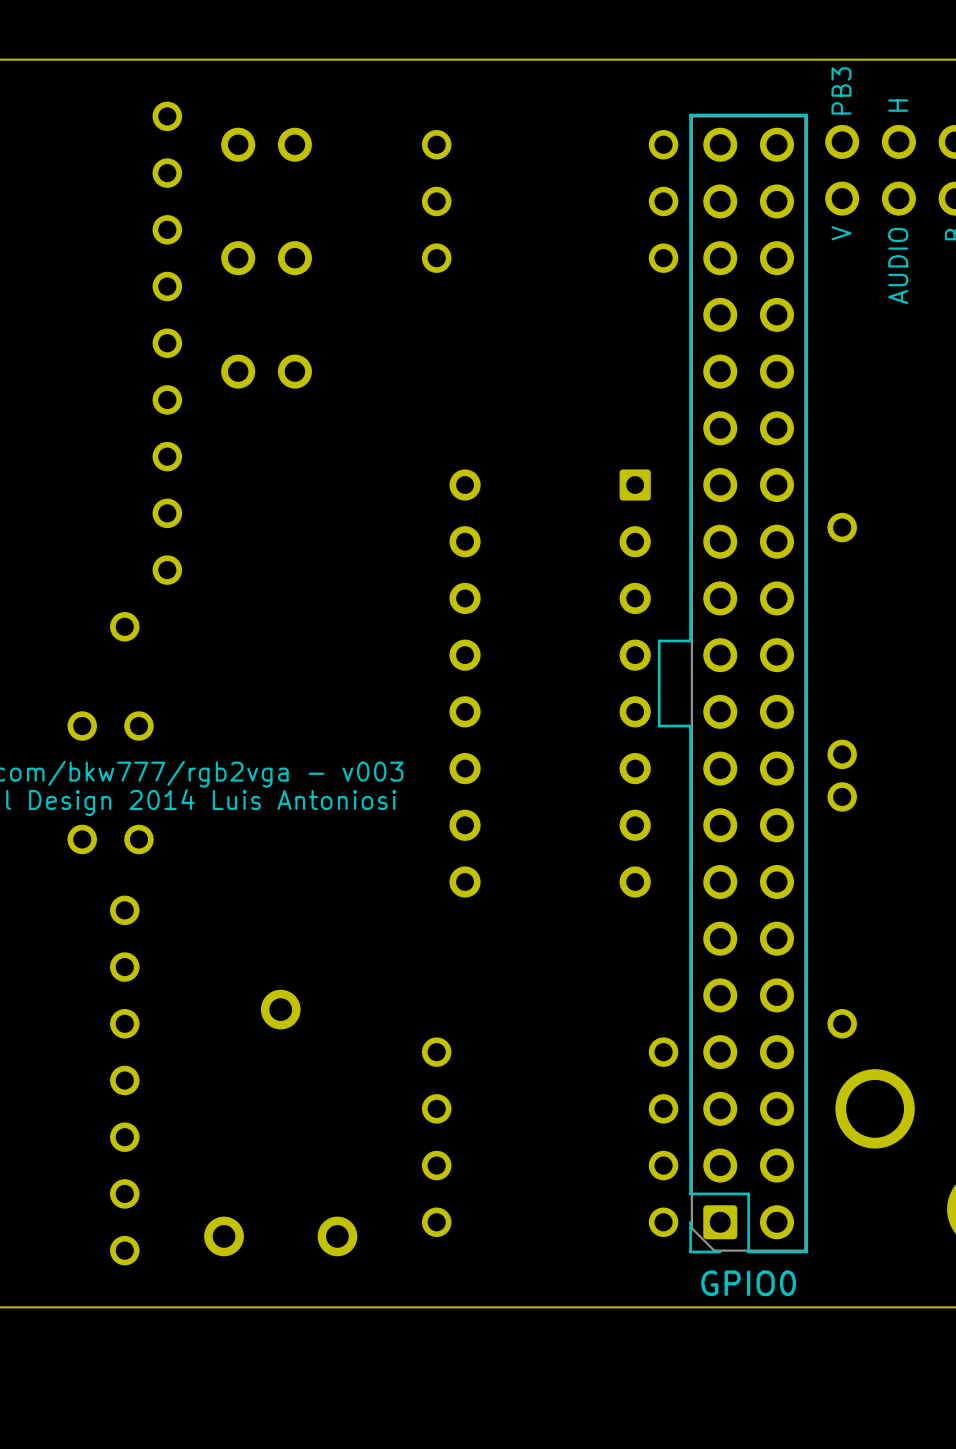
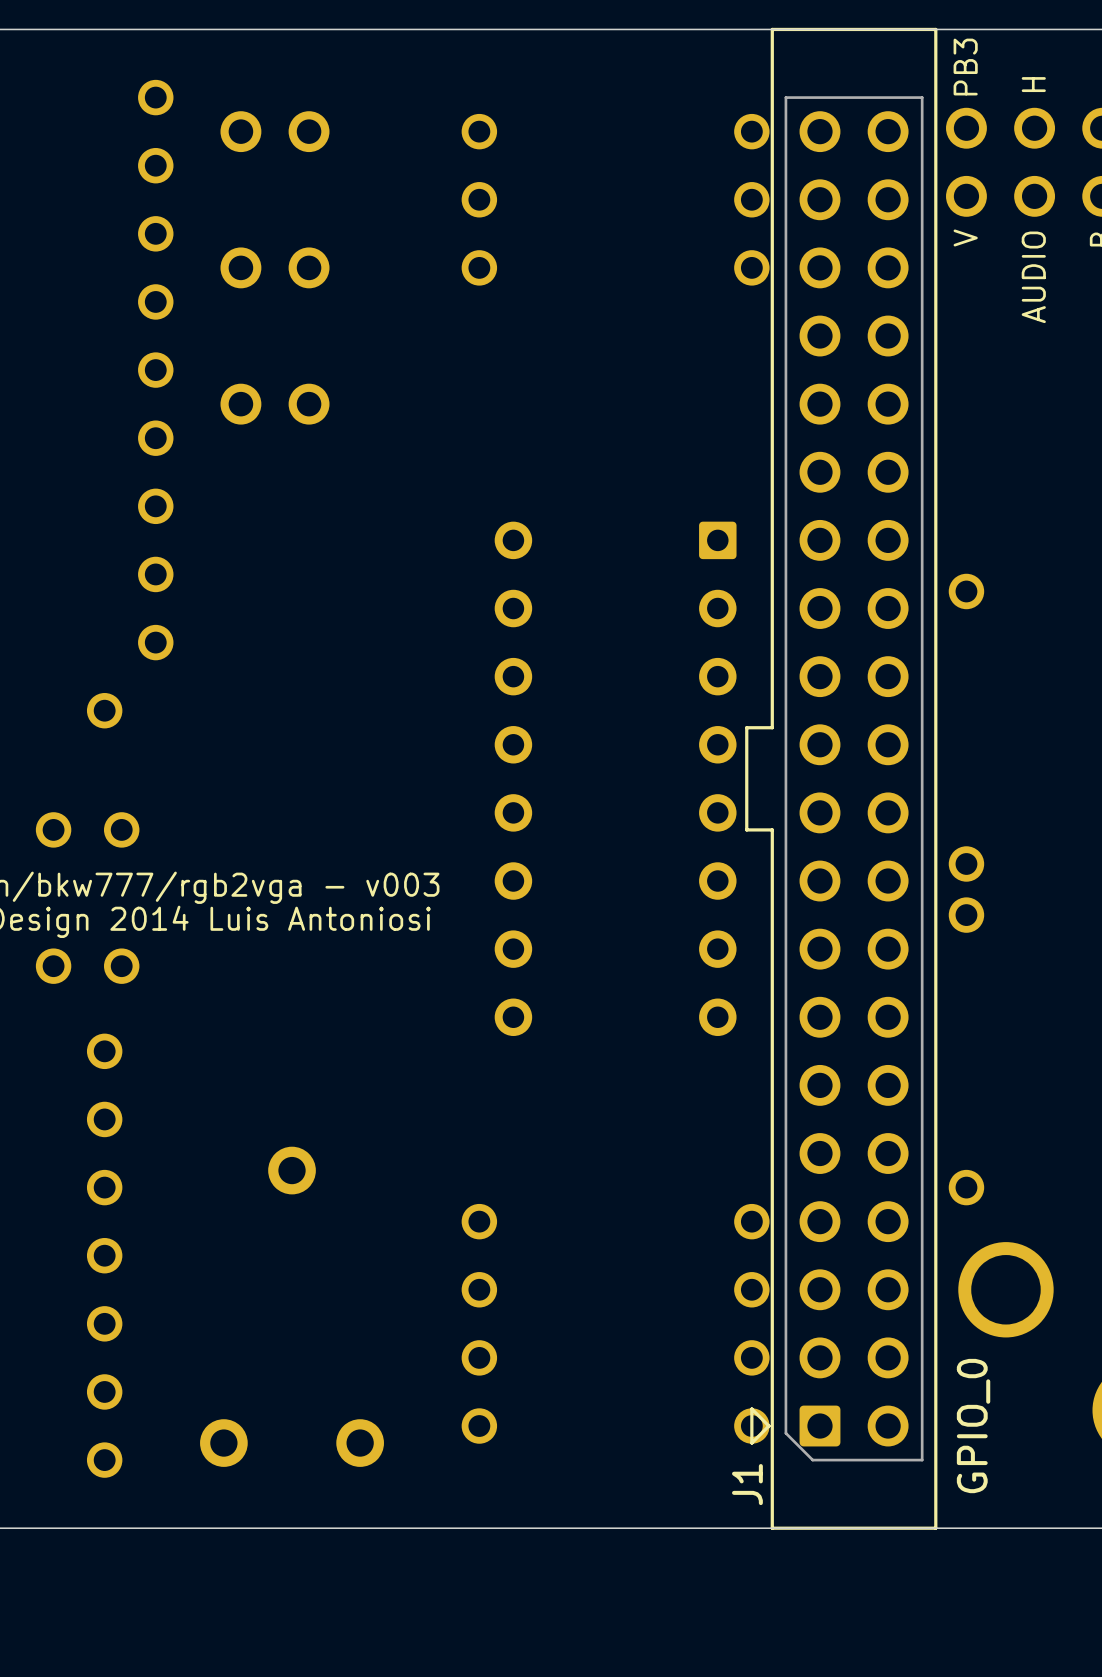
GPIO0: (732, 683) -> none
J1: none -> GPIO_0 (841, 778)

